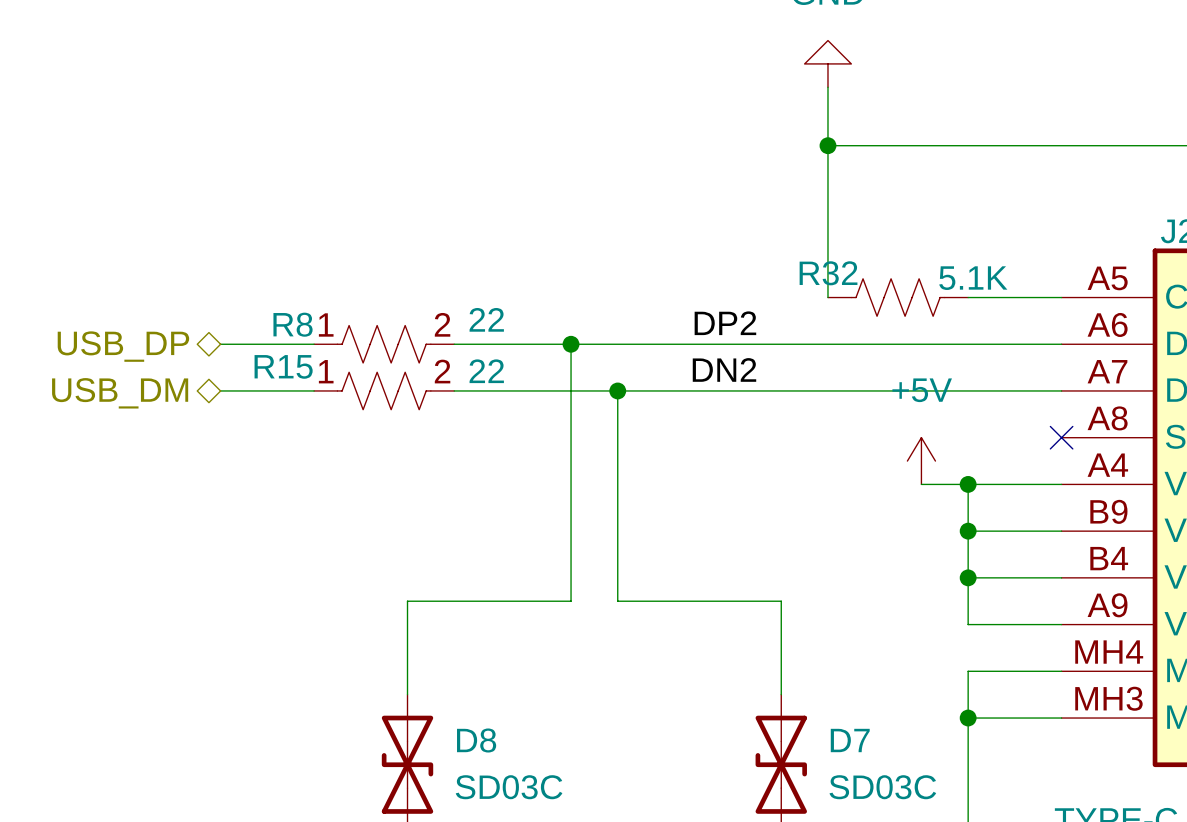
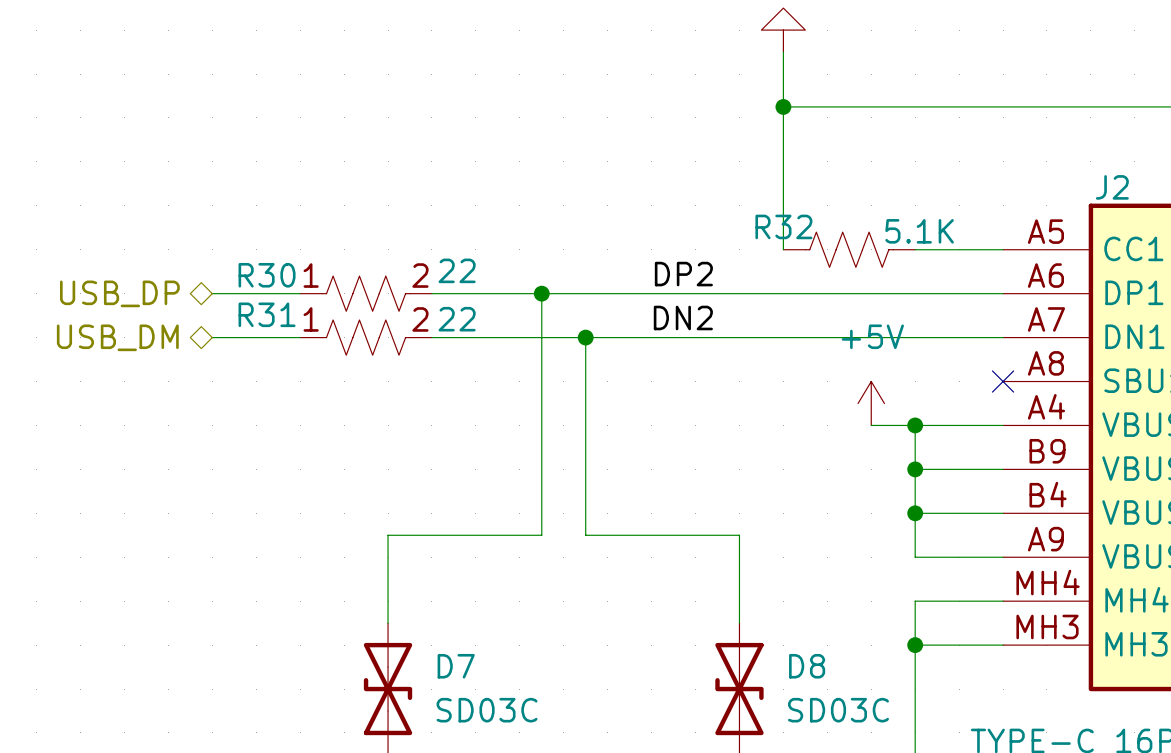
R8 name: R8 (293, 324) -> R30 (267, 275)
R15 name: R15 (283, 366) -> R31 (267, 314)
D8 name: D8 (476, 740) -> D7 (456, 666)
D7 name: D7 (850, 740) -> D8 (807, 666)

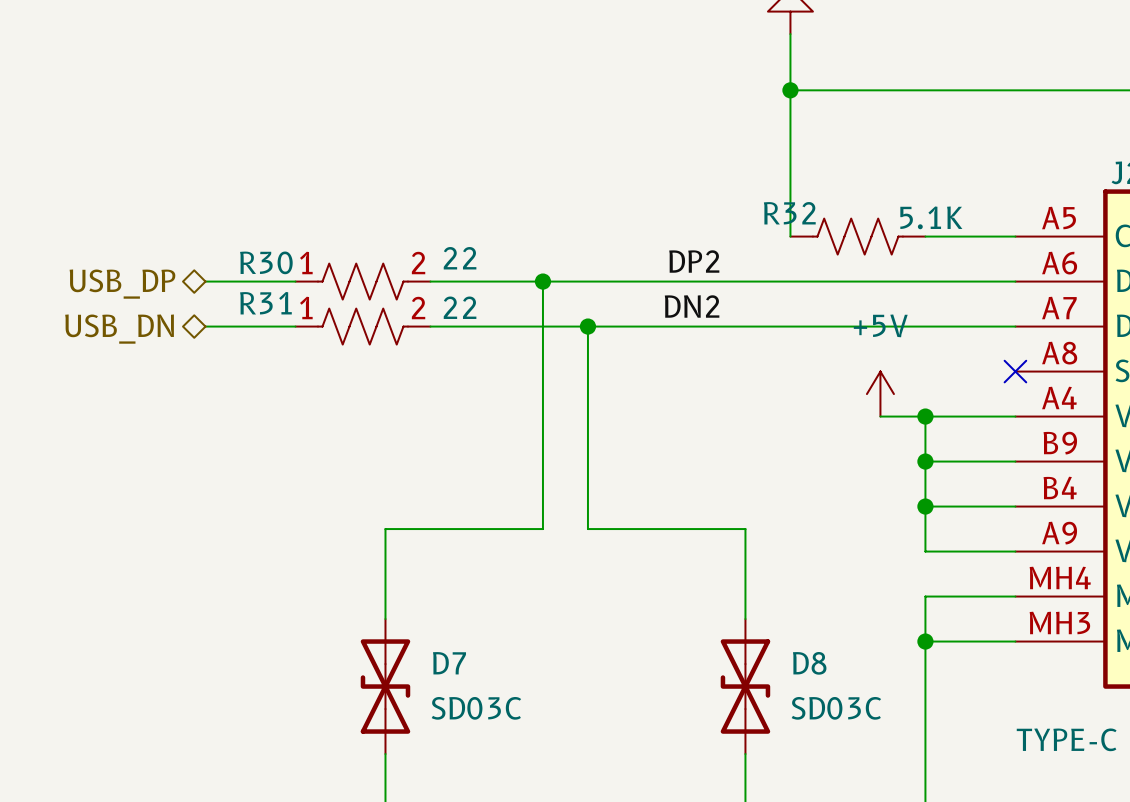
hierarchical label: USB_DM (117, 337) -> USB_DN (119, 329)

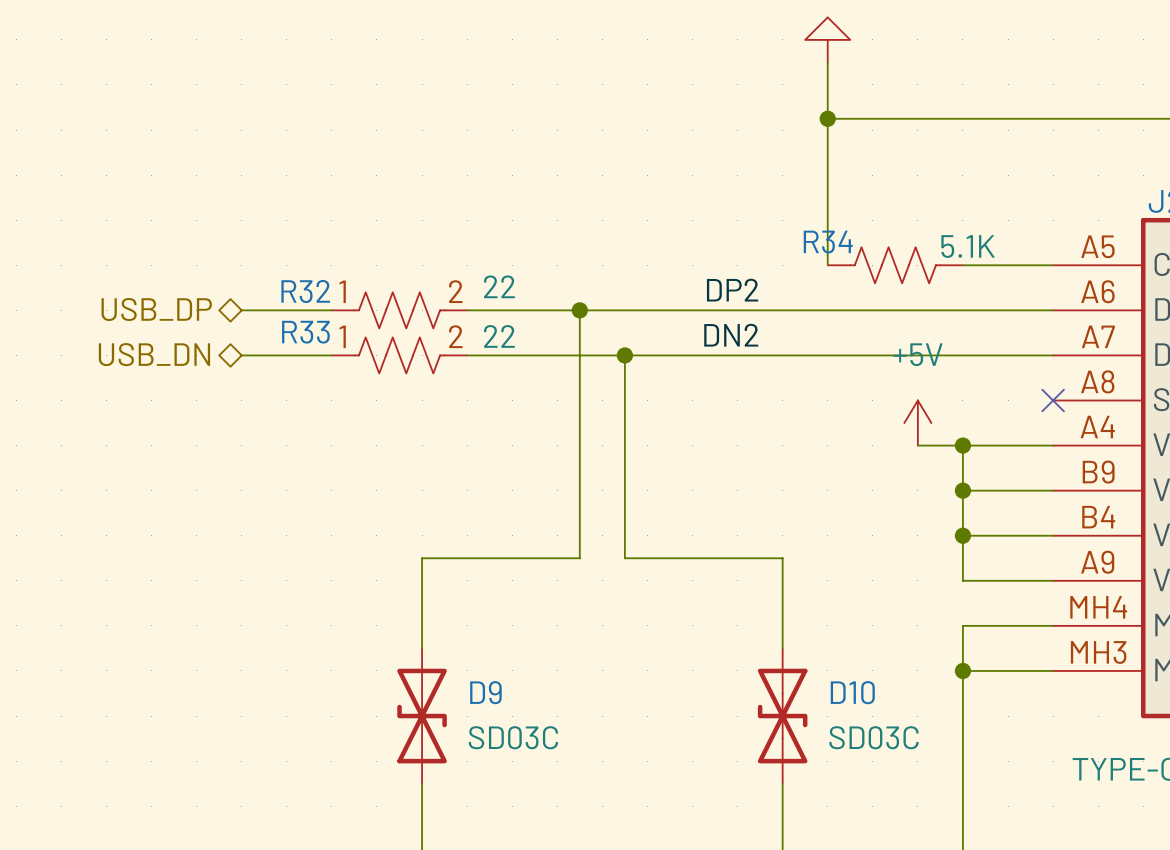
R32 name: R32 (789, 213) -> R34 (828, 242)
R30 name: R30 (266, 262) -> R32 (305, 291)
R31 name: R31 (265, 303) -> R33 (305, 332)
D7 name: D7 (449, 663) -> D9 (485, 692)
D8 name: D8 (809, 663) -> D10 (852, 692)

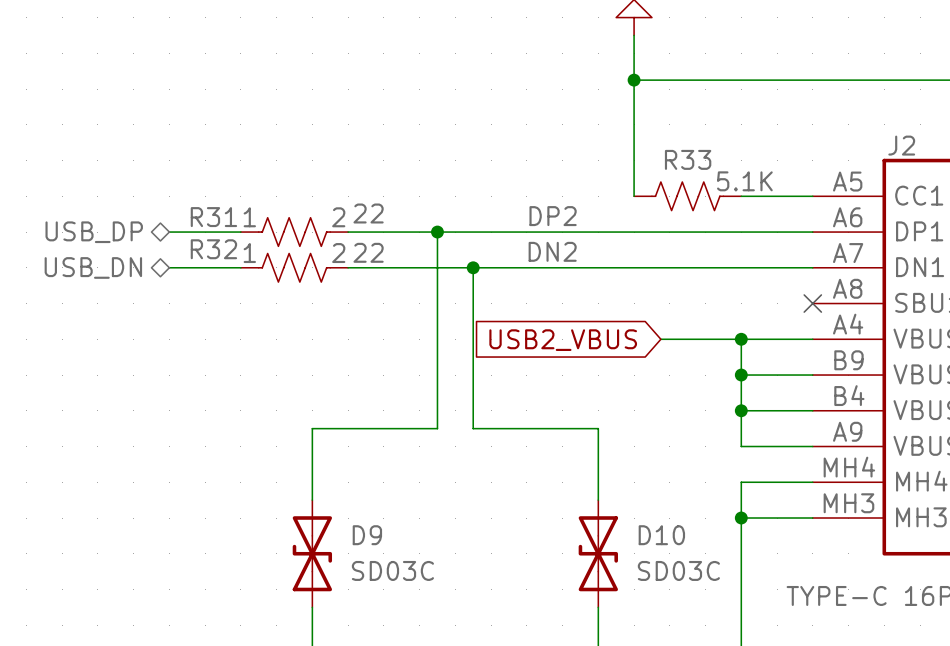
R34 name: R34 (828, 242) -> R33 (688, 159)
R32 name: R32 (305, 291) -> R31 (213, 217)
R33 name: R33 (305, 332) -> R32 (213, 249)
power symbol: +5V (917, 423) -> none
global label: none -> USB2_VBUS (563, 340)
wire: none -> (660, 339) (705, 339)

